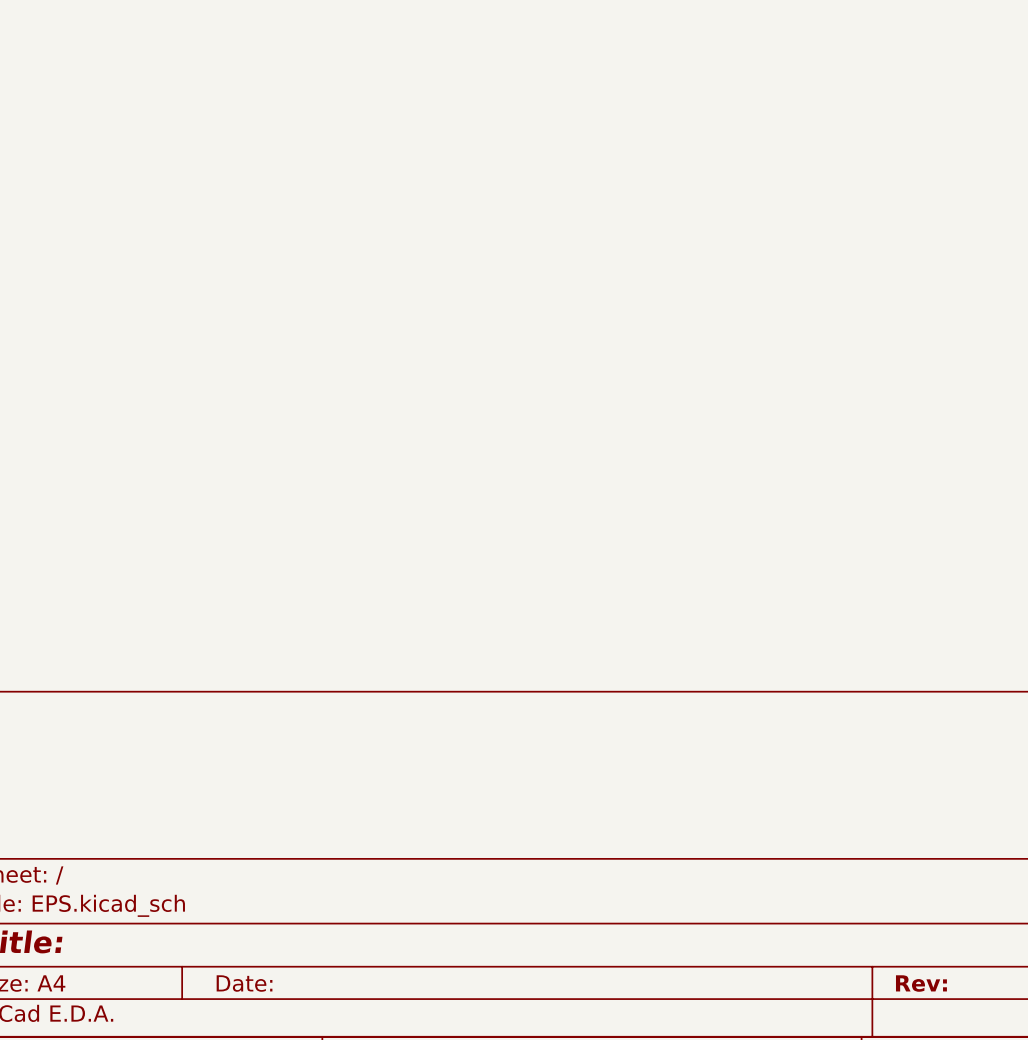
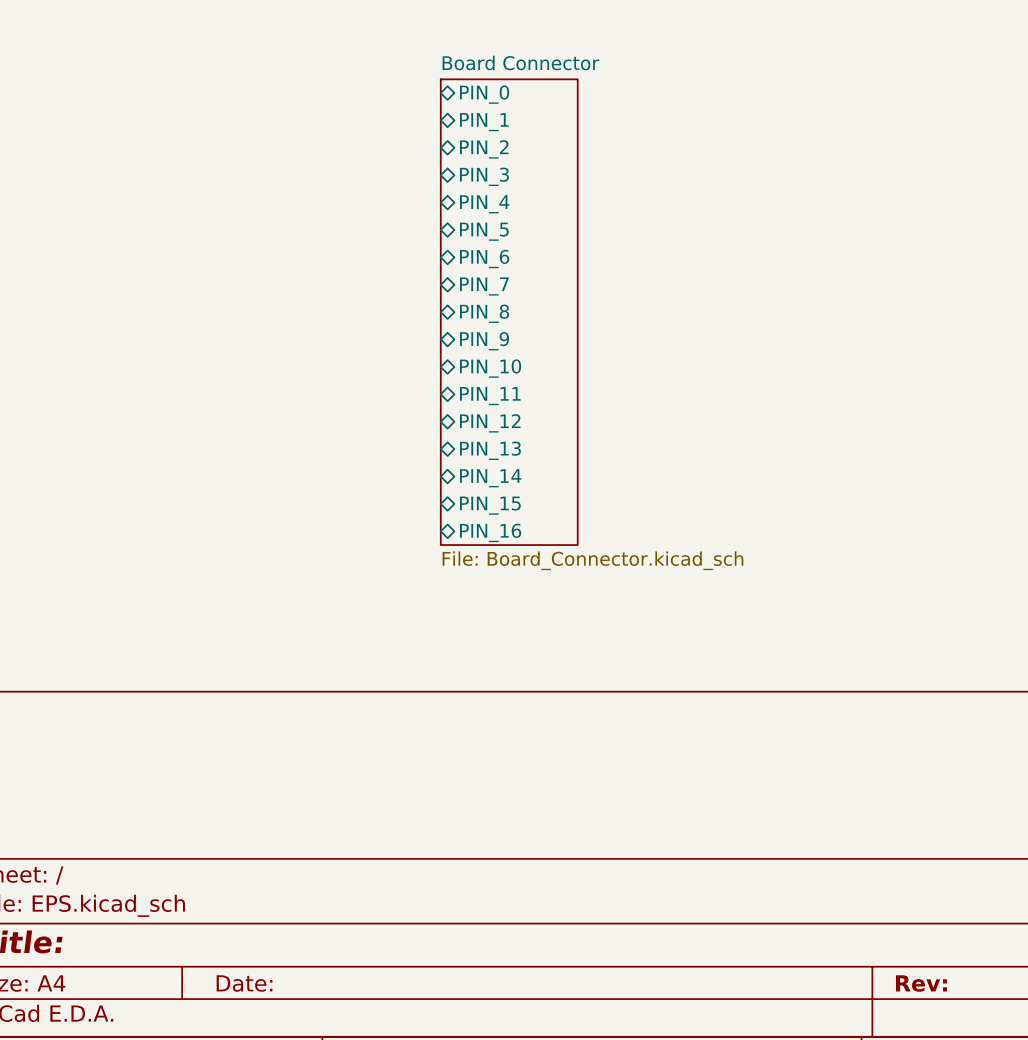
sheet pin: none -> PIN_0 (484, 94)
sheet pin: none -> PIN_1 (484, 122)
sheet pin: none -> PIN_2 (484, 149)
sheet pin: none -> PIN_3 (484, 176)
sheet pin: none -> PIN_4 (484, 204)
sheet pin: none -> PIN_5 (484, 231)
sheet pin: none -> PIN_6 (484, 258)
sheet pin: none -> PIN_7 (484, 286)
sheet Board Connector: none -> File: Board_Connector.kicad_sch (509, 312)
sheet pin: none -> PIN_8 (484, 313)
sheet pin: none -> PIN_9 (484, 341)
sheet pin: none -> PIN_10 (490, 368)
sheet pin: none -> PIN_11 (490, 396)
sheet pin: none -> PIN_12 (490, 423)
sheet pin: none -> PIN_13 (490, 450)
sheet pin: none -> PIN_14 (490, 478)
sheet pin: none -> PIN_15 (490, 505)
sheet pin: none -> PIN_16 (490, 532)

